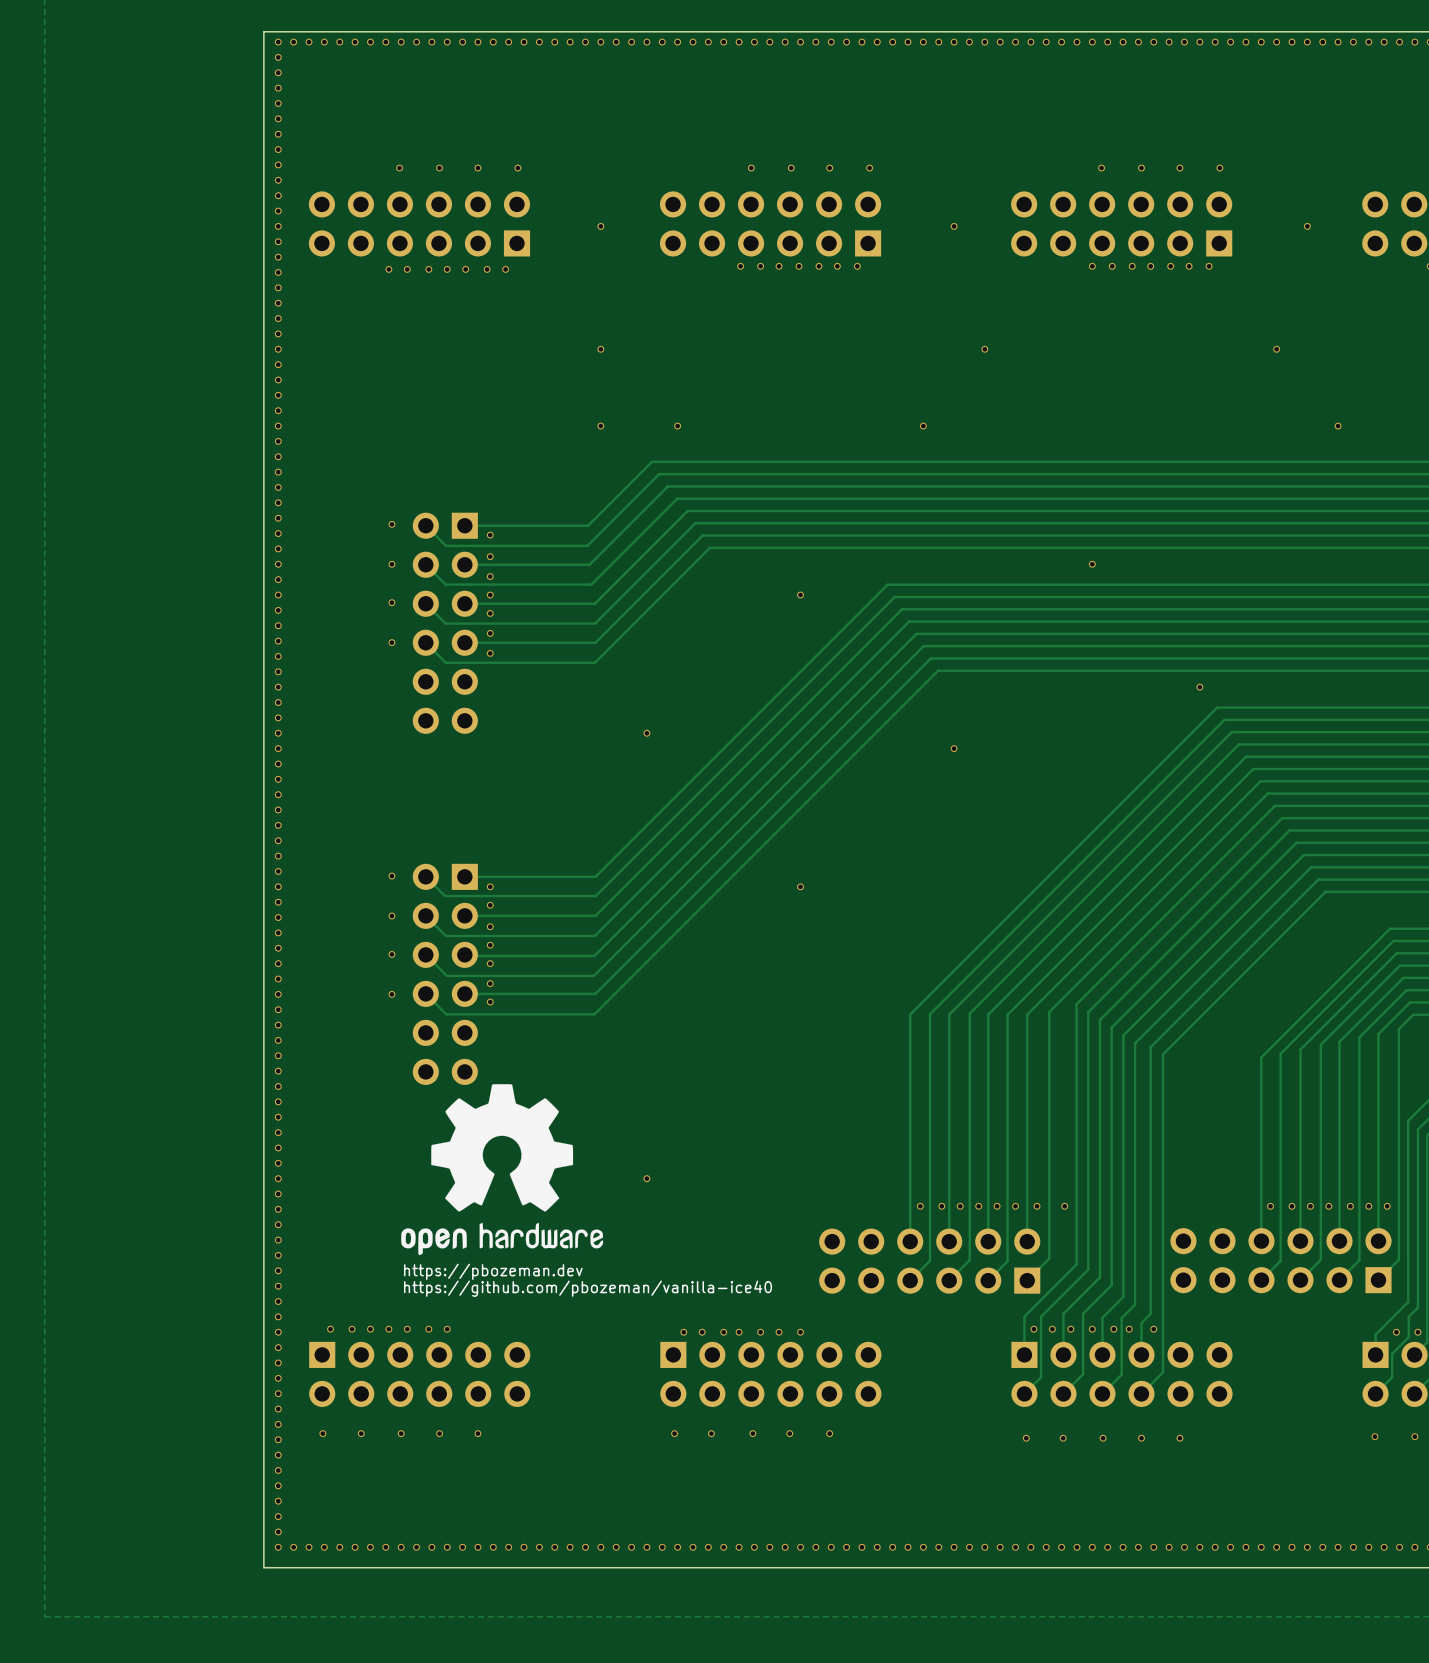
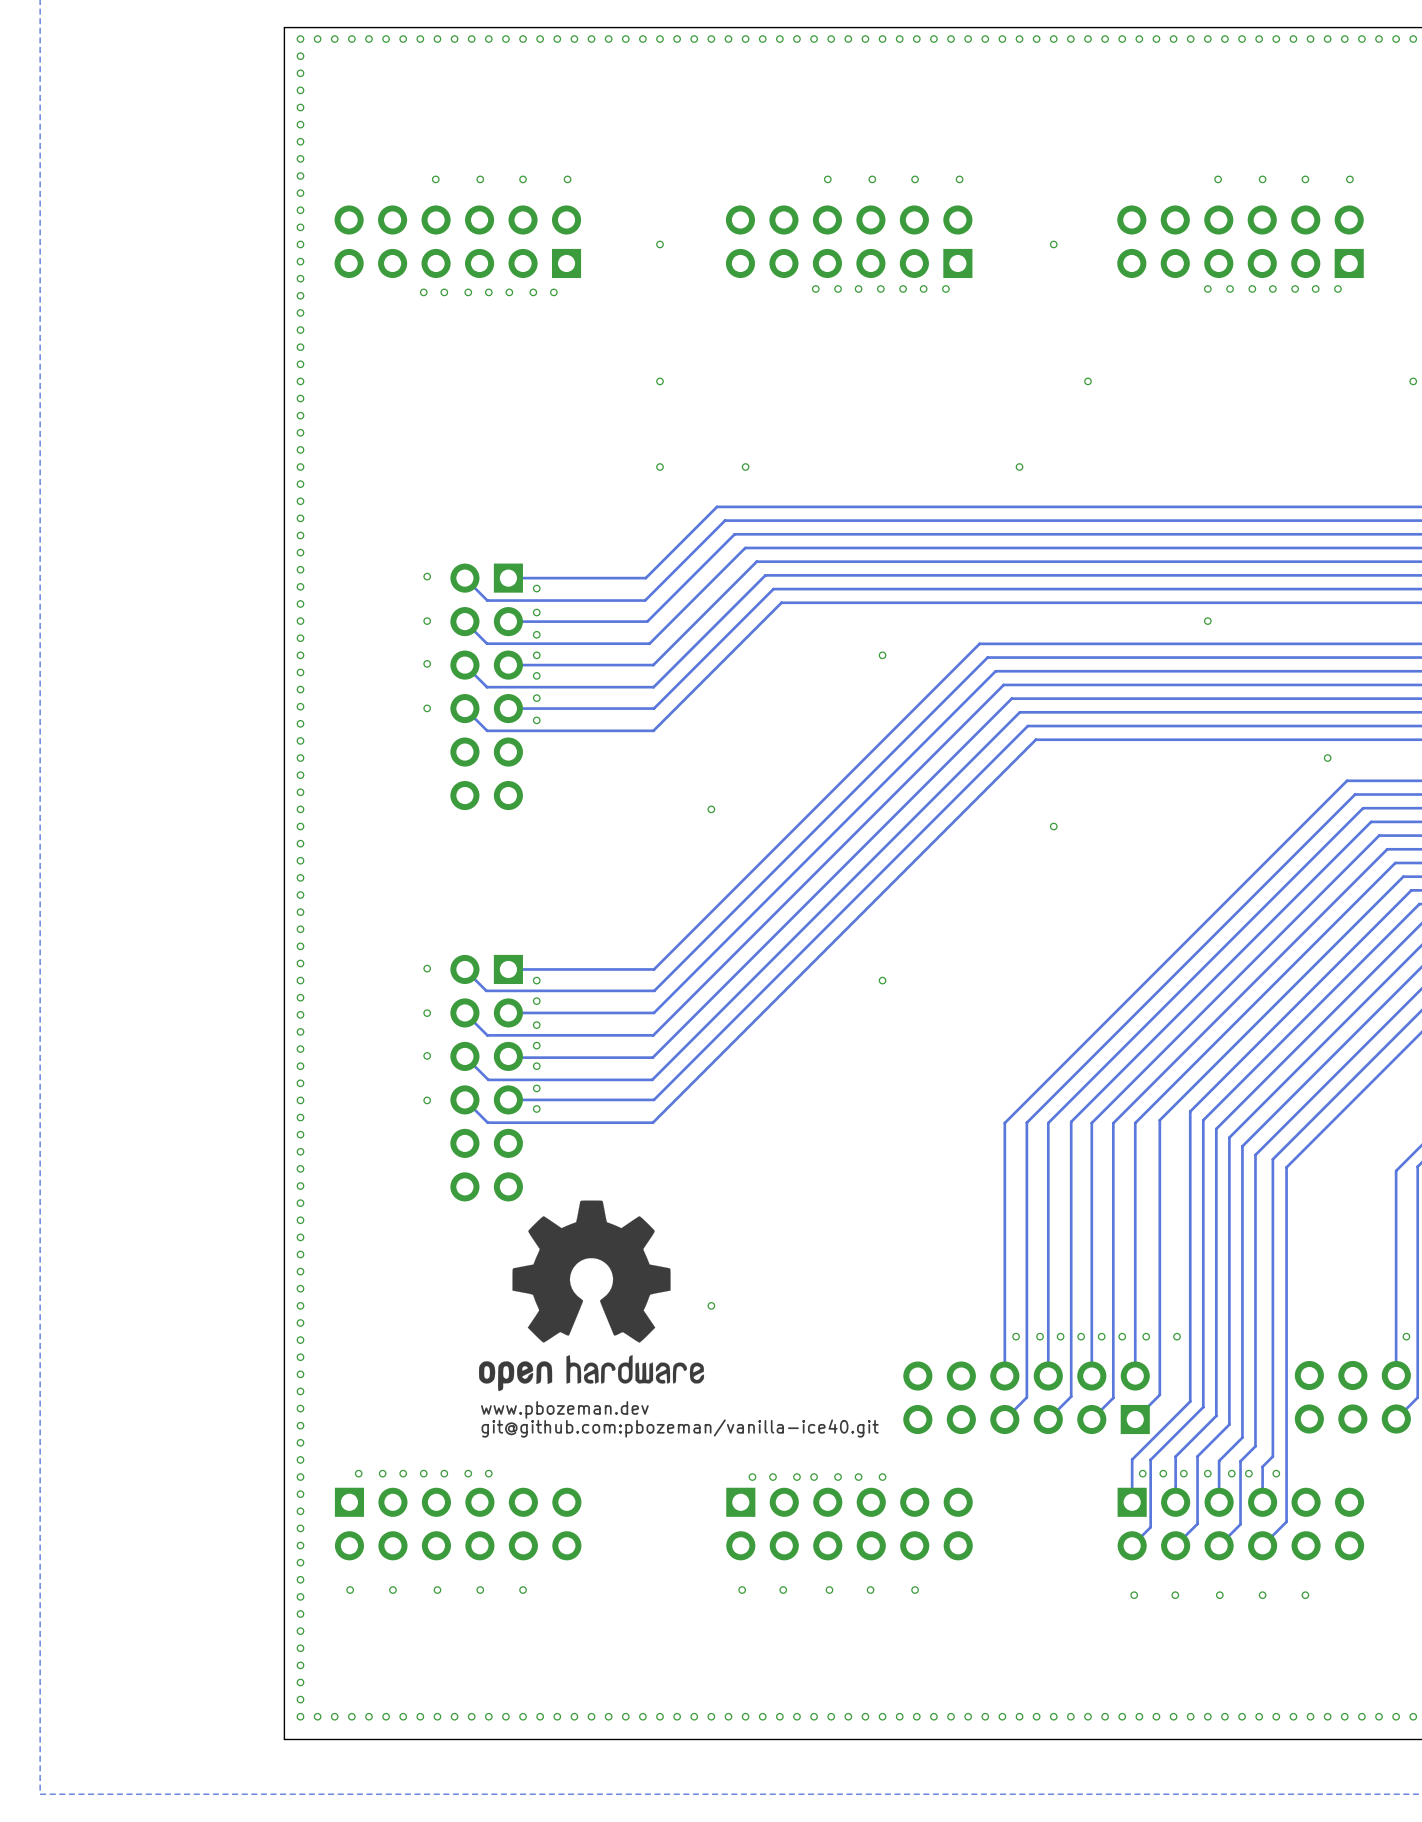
drawing position: (502, 1169) -> (591, 1295)
text: https://pbozeman.dev (493, 1271) -> www.pbozeman.dev (564, 1409)
text: https://github.com/pbozeman/vanilla-ice40 (588, 1288) -> git@github.com:pbozeman/vanilla-ice40.git (680, 1428)

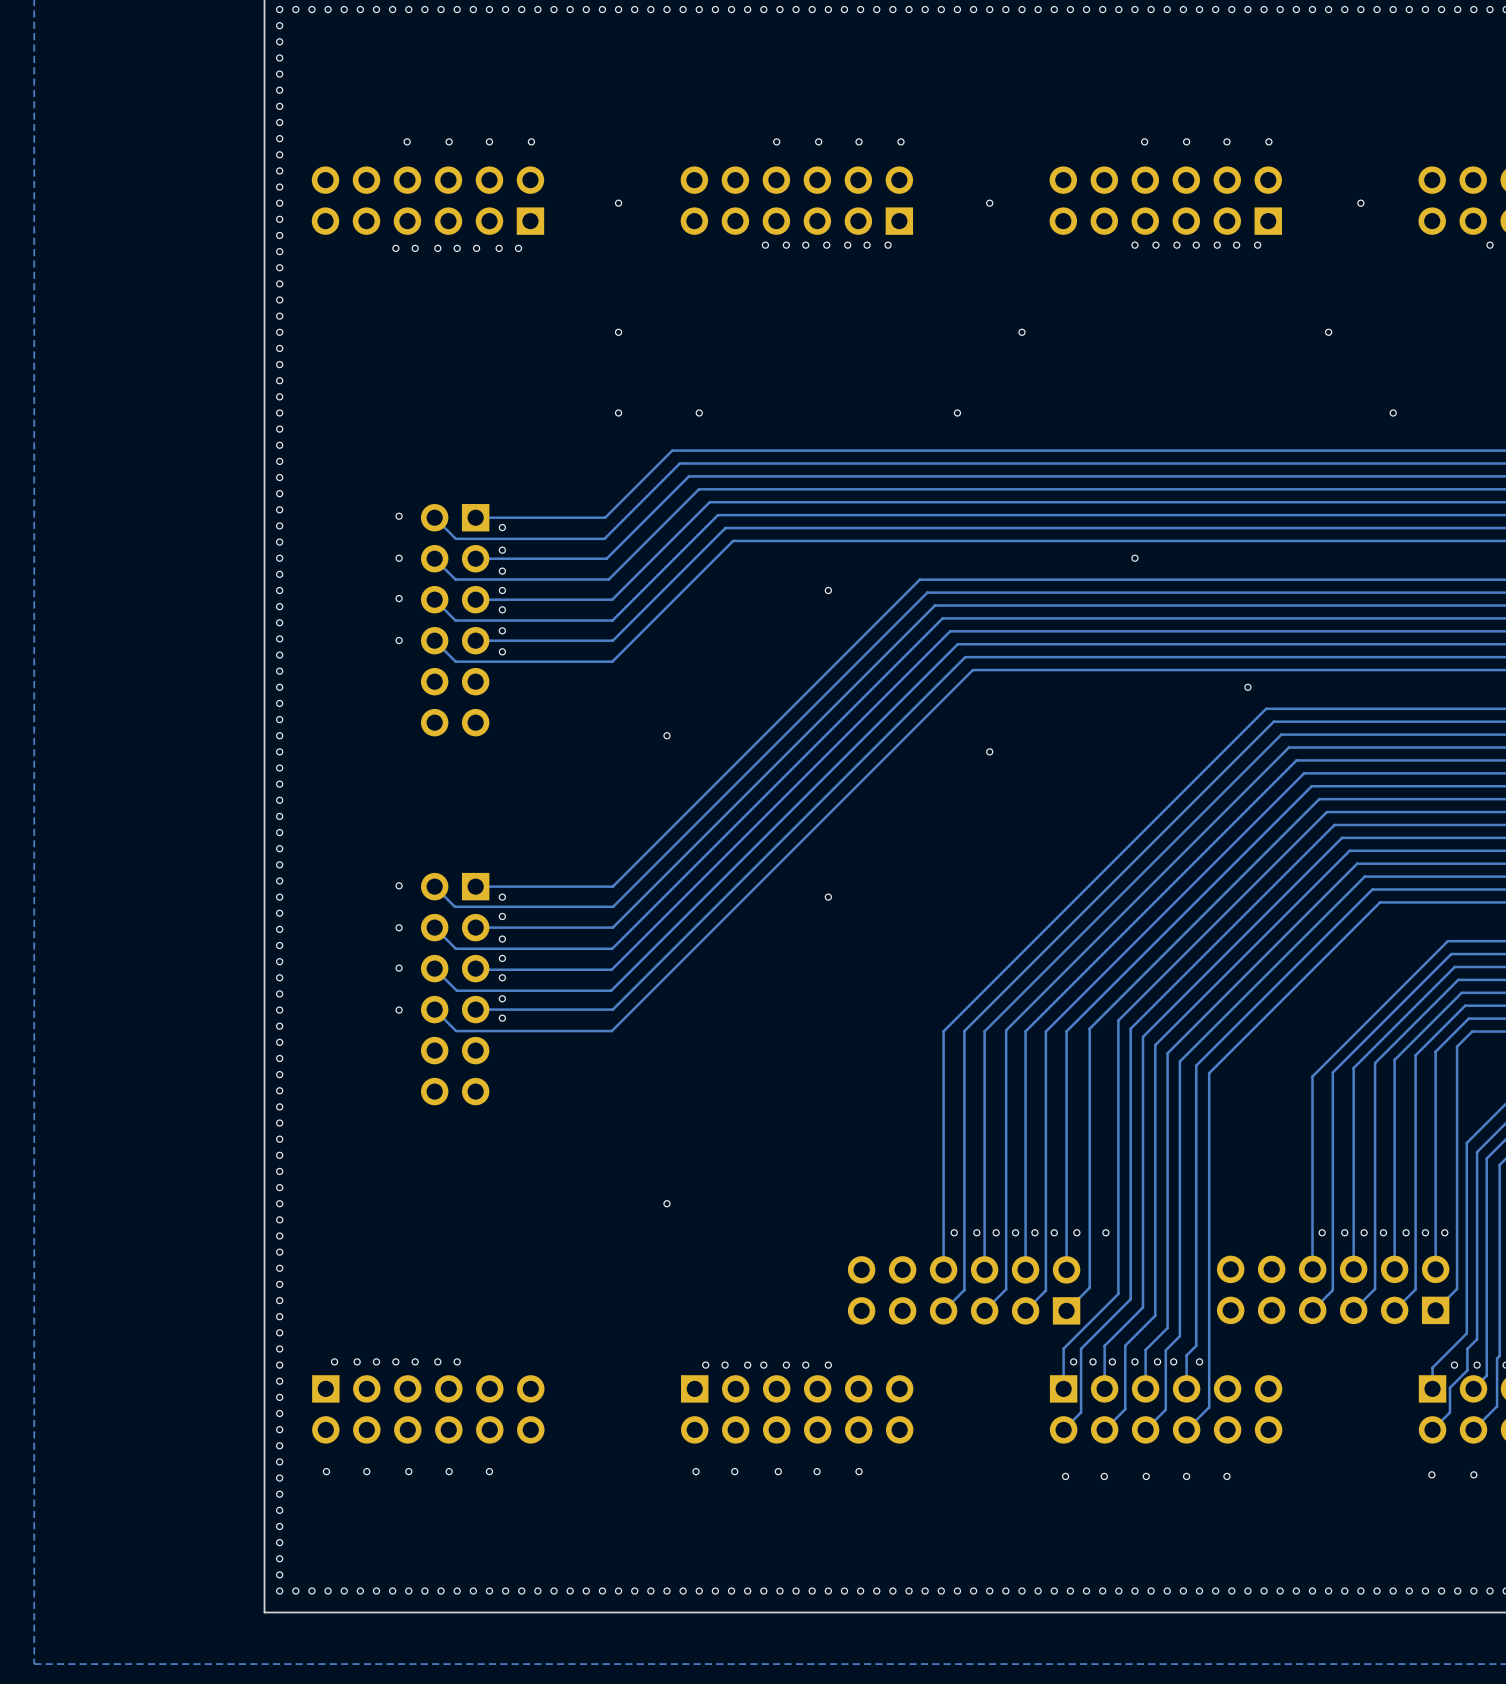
drawing: [478, 1200, 705, 1392] -> none
text: www.pbozeman.dev (564, 1409) -> none
text: git@github.com:pbozeman/vanilla-ice40.git (680, 1428) -> none

